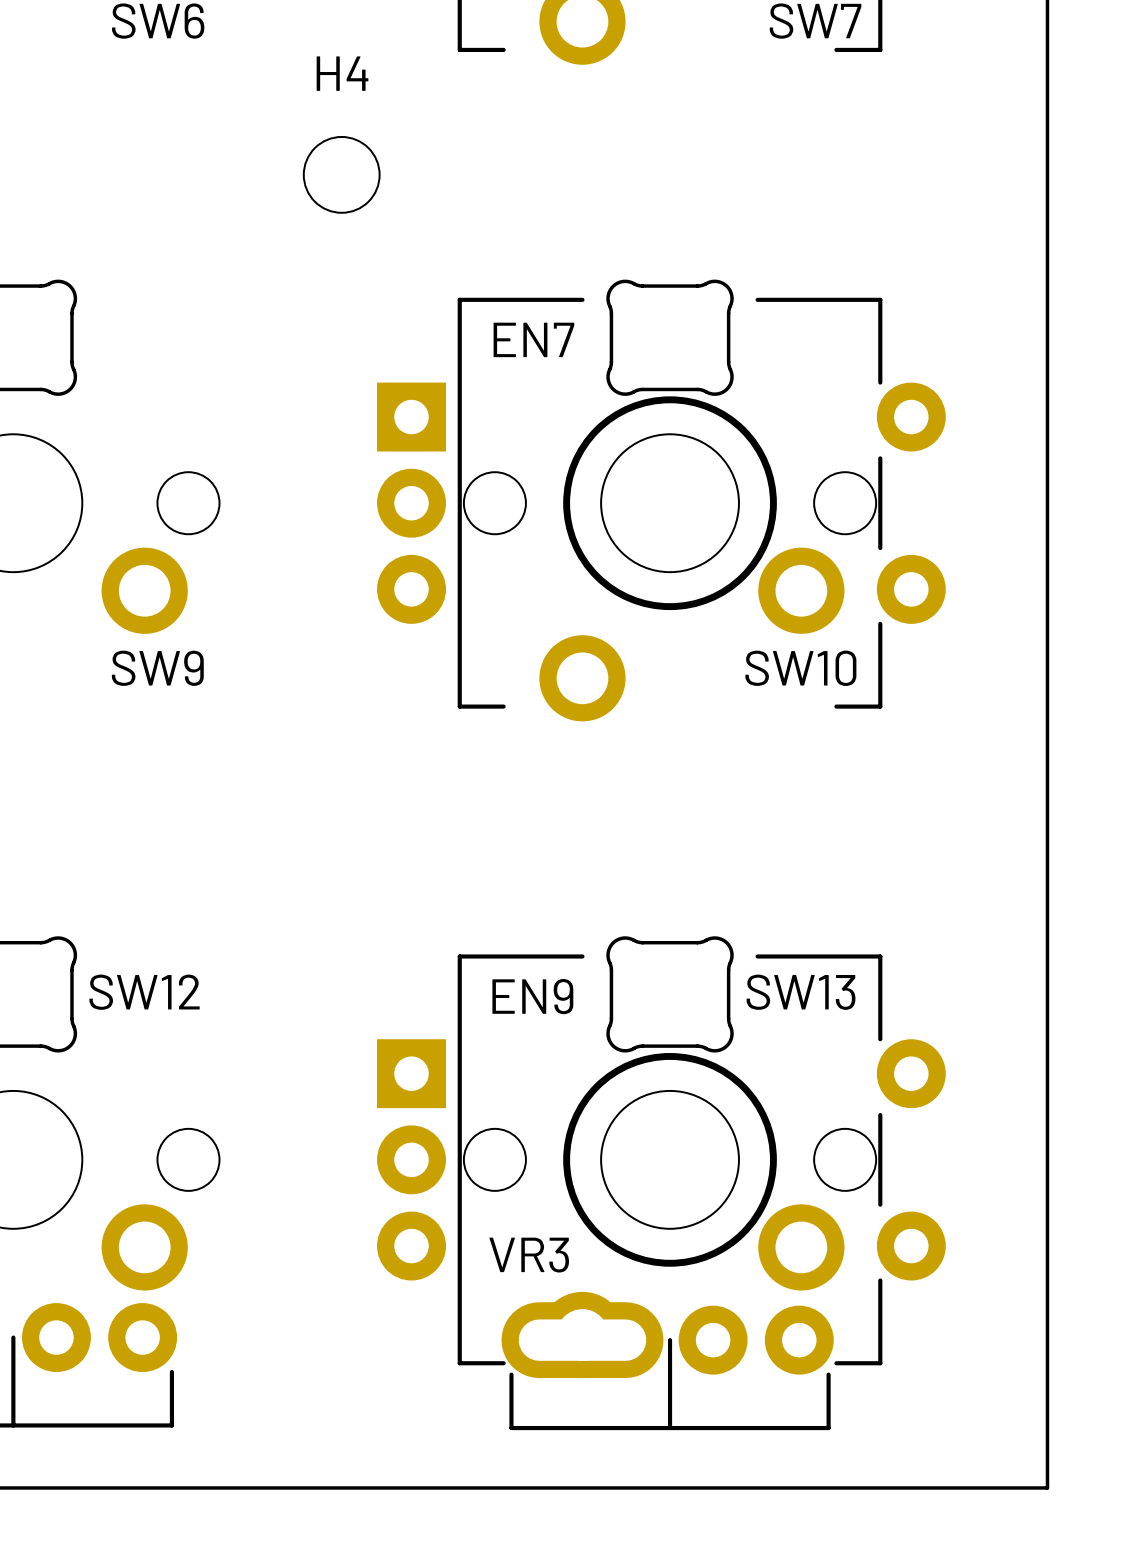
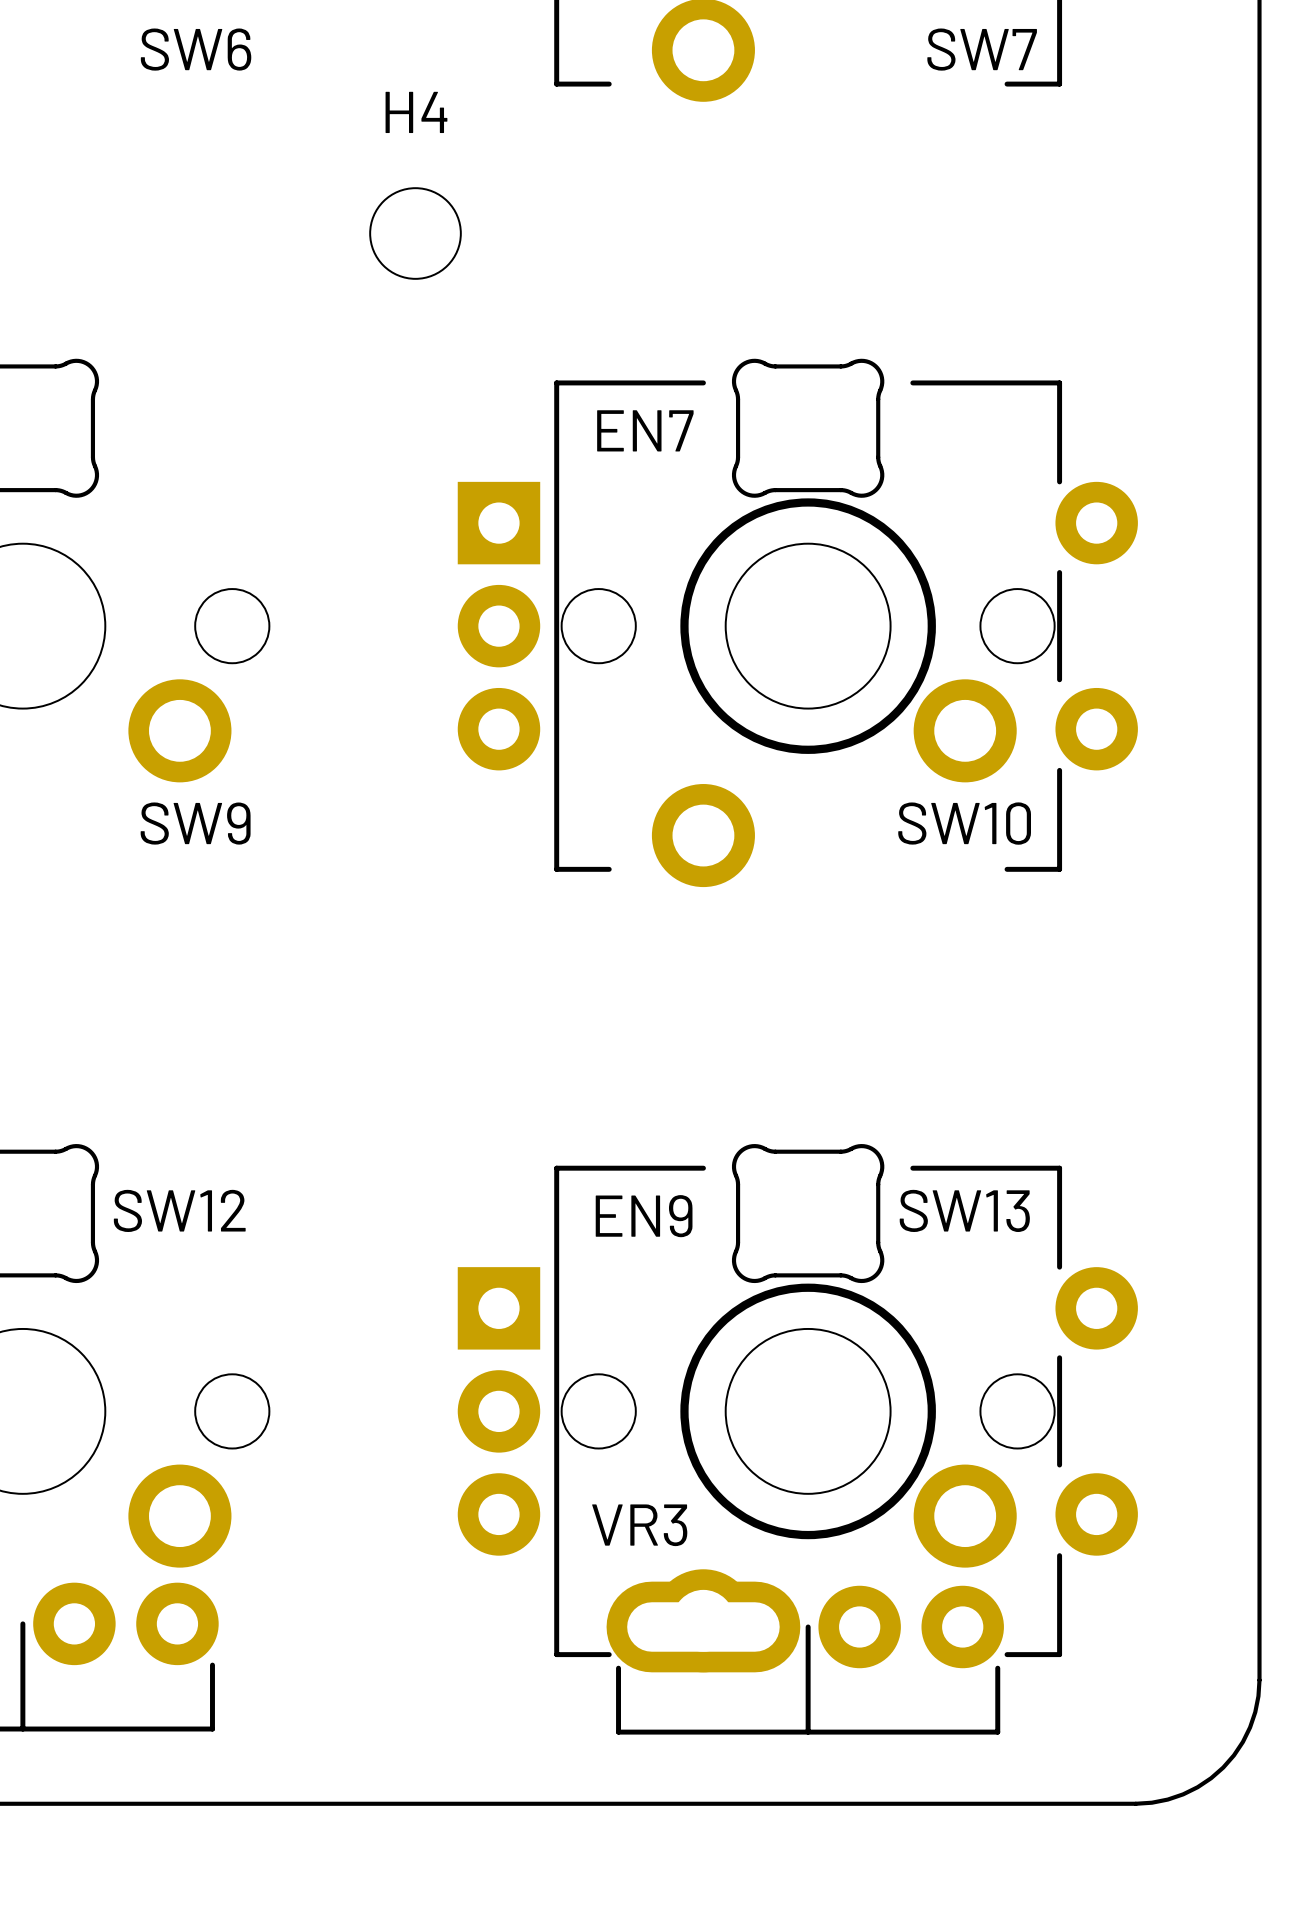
board edge: (1047, 1384) (1047, 1487) (944, 1487) -> (1259, 1680) (1255, 1712) (1250, 1727) (1242, 1741) (1223, 1767) (1197, 1787) (1183, 1794) (1167, 1799) (1135, 1803)

